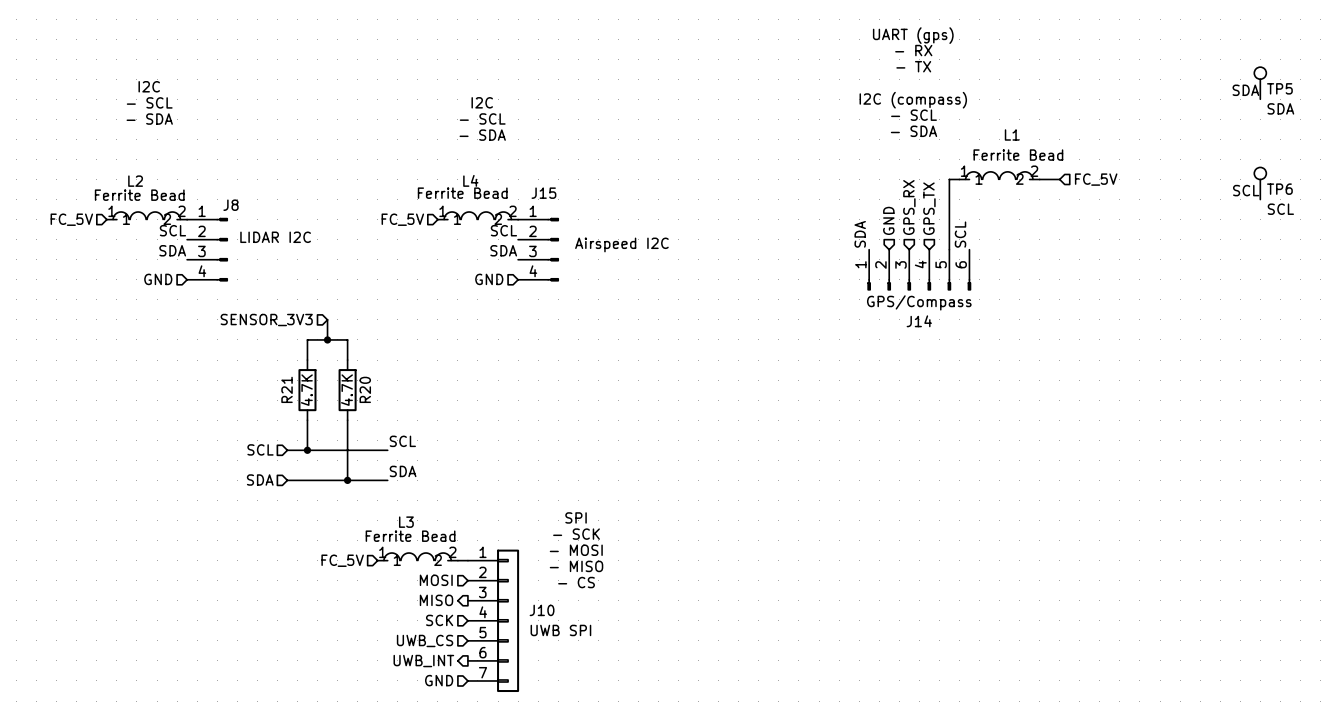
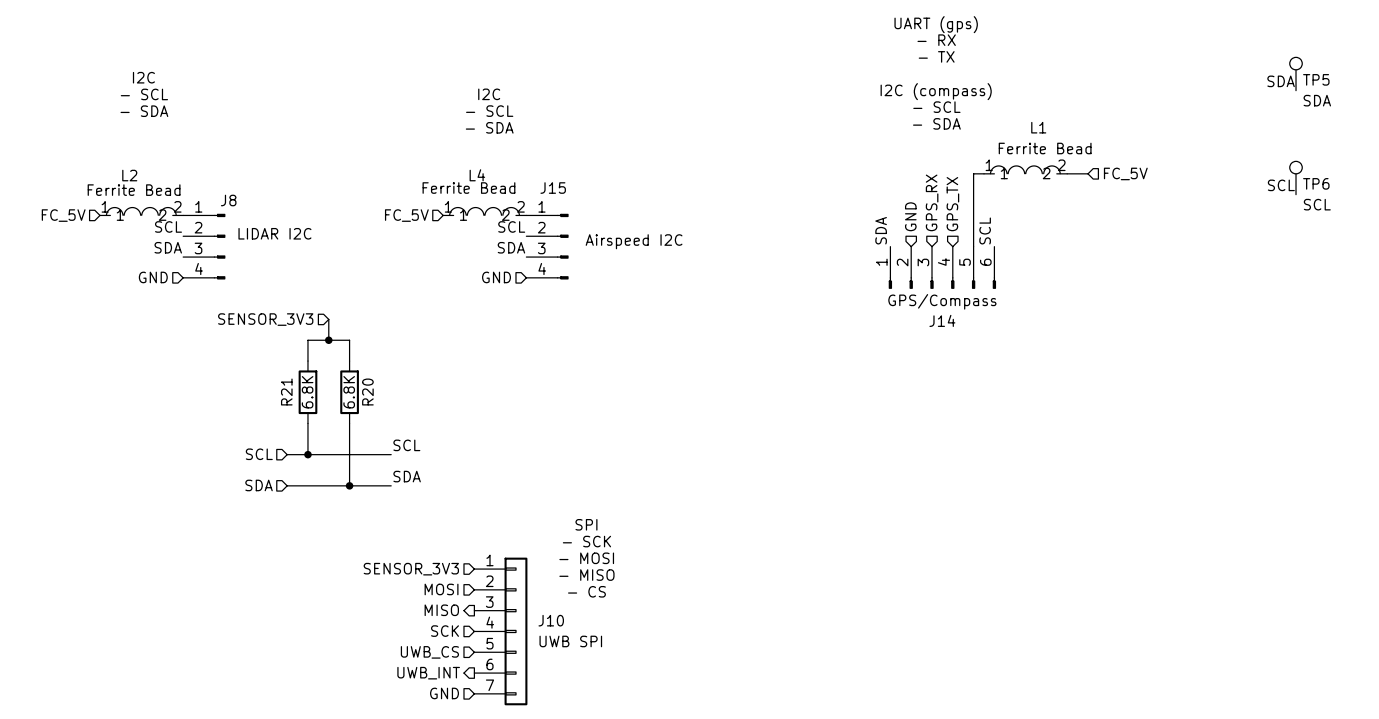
R21 value: 4.7K (306, 390) -> 6.8K (307, 392)
R20 value: 4.7K (346, 390) -> 6.8K (349, 392)
L3: Ferrite Bead (417, 556) -> none
hierarchical label: FC_5V (342, 560) -> none
hierarchical label: none -> SENSOR_3V3 (411, 569)
wire: (457, 560) (467, 560) -> none

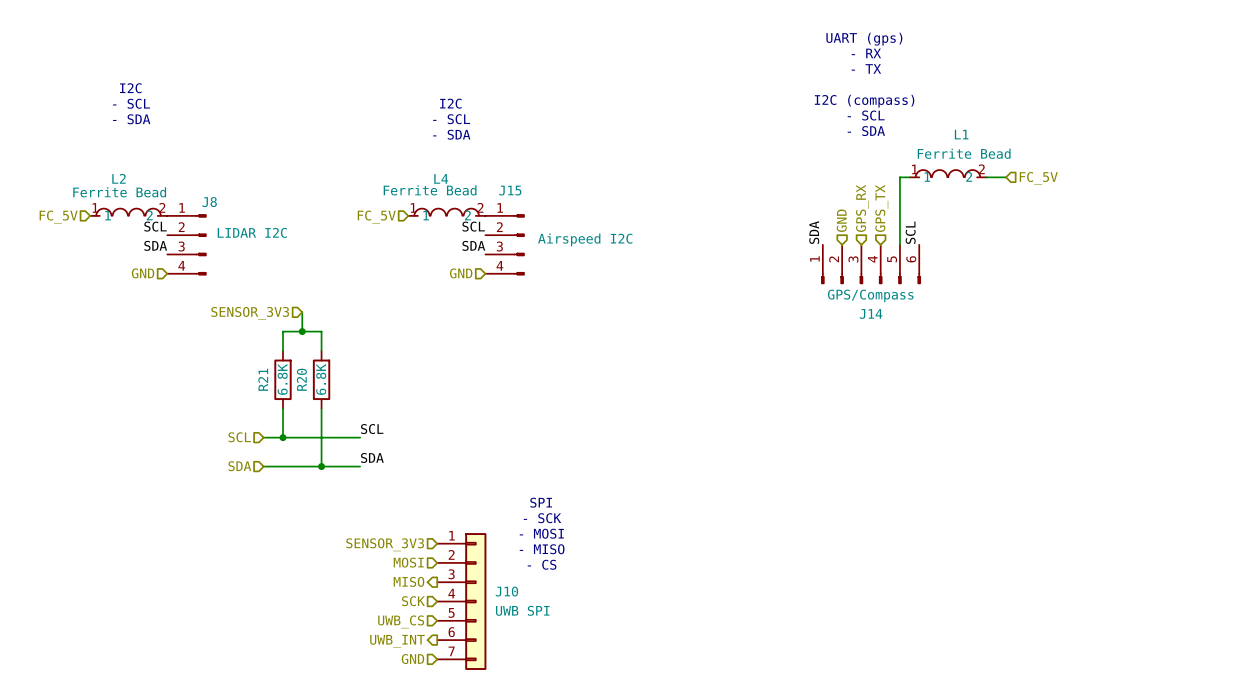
TP5: SDA (1296, 74) -> none
label: SDA (1281, 81) -> none
TP6: SCL (1296, 178) -> none
label: SCL (1281, 185) -> none
R20 name position: R20 (367, 392) -> R20 (301, 379)

